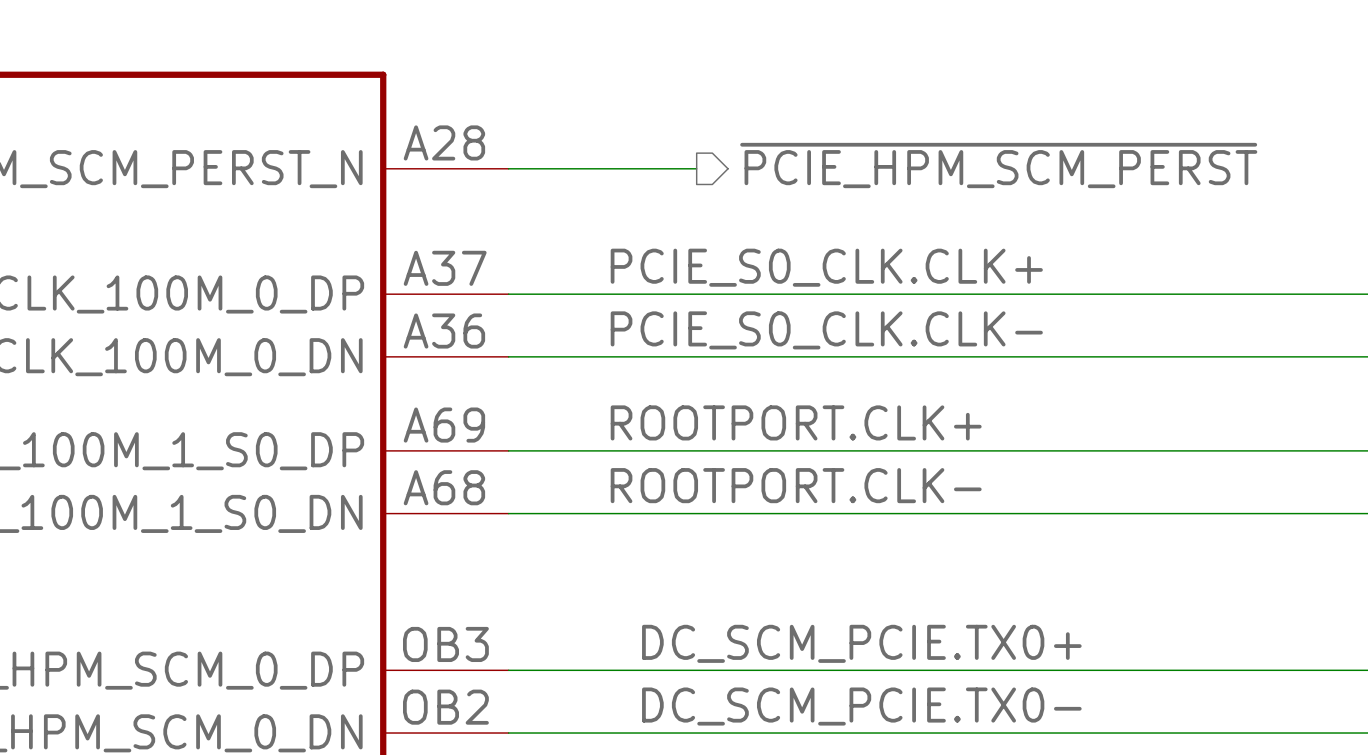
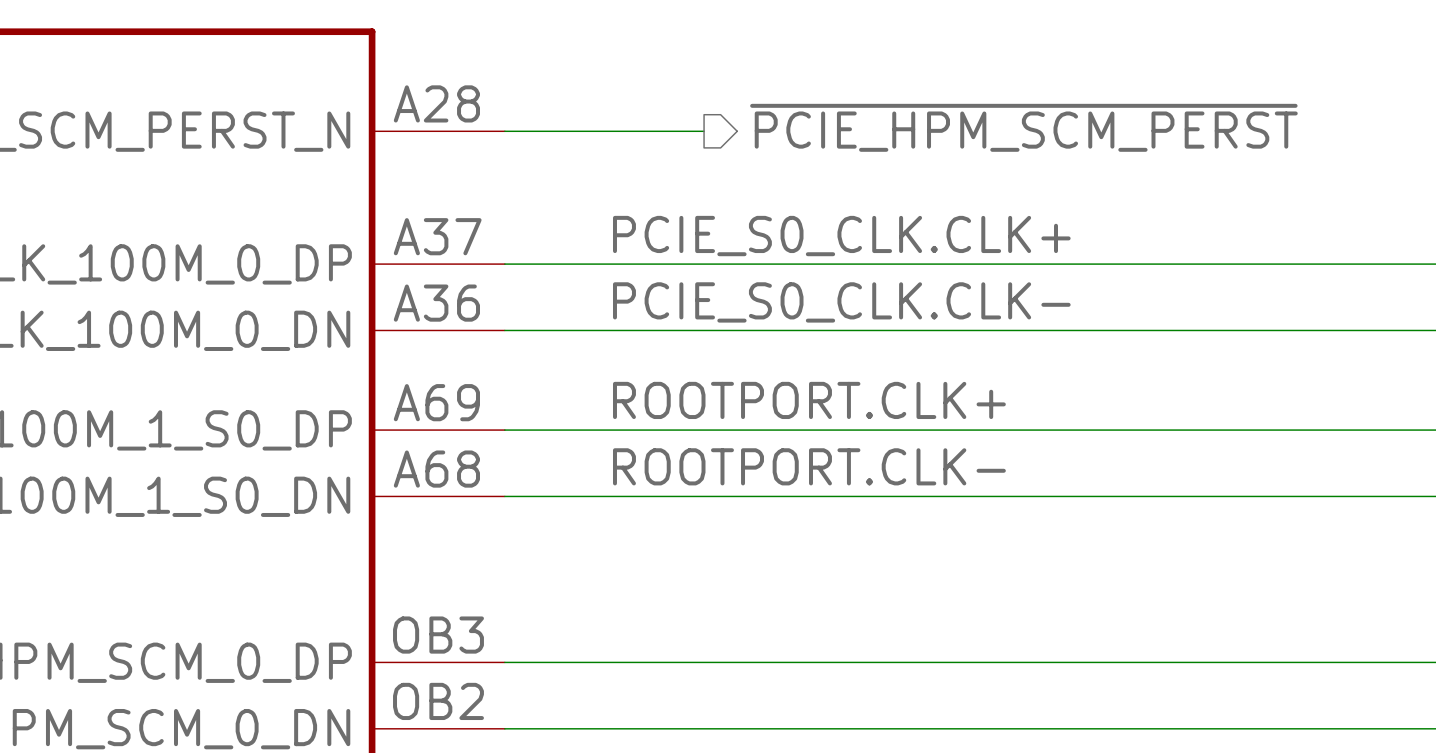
label: DC_SCM_PCIE.TX0+ (861, 643) -> none
label: DC_SCM_PCIE.TX0- (861, 706) -> none

